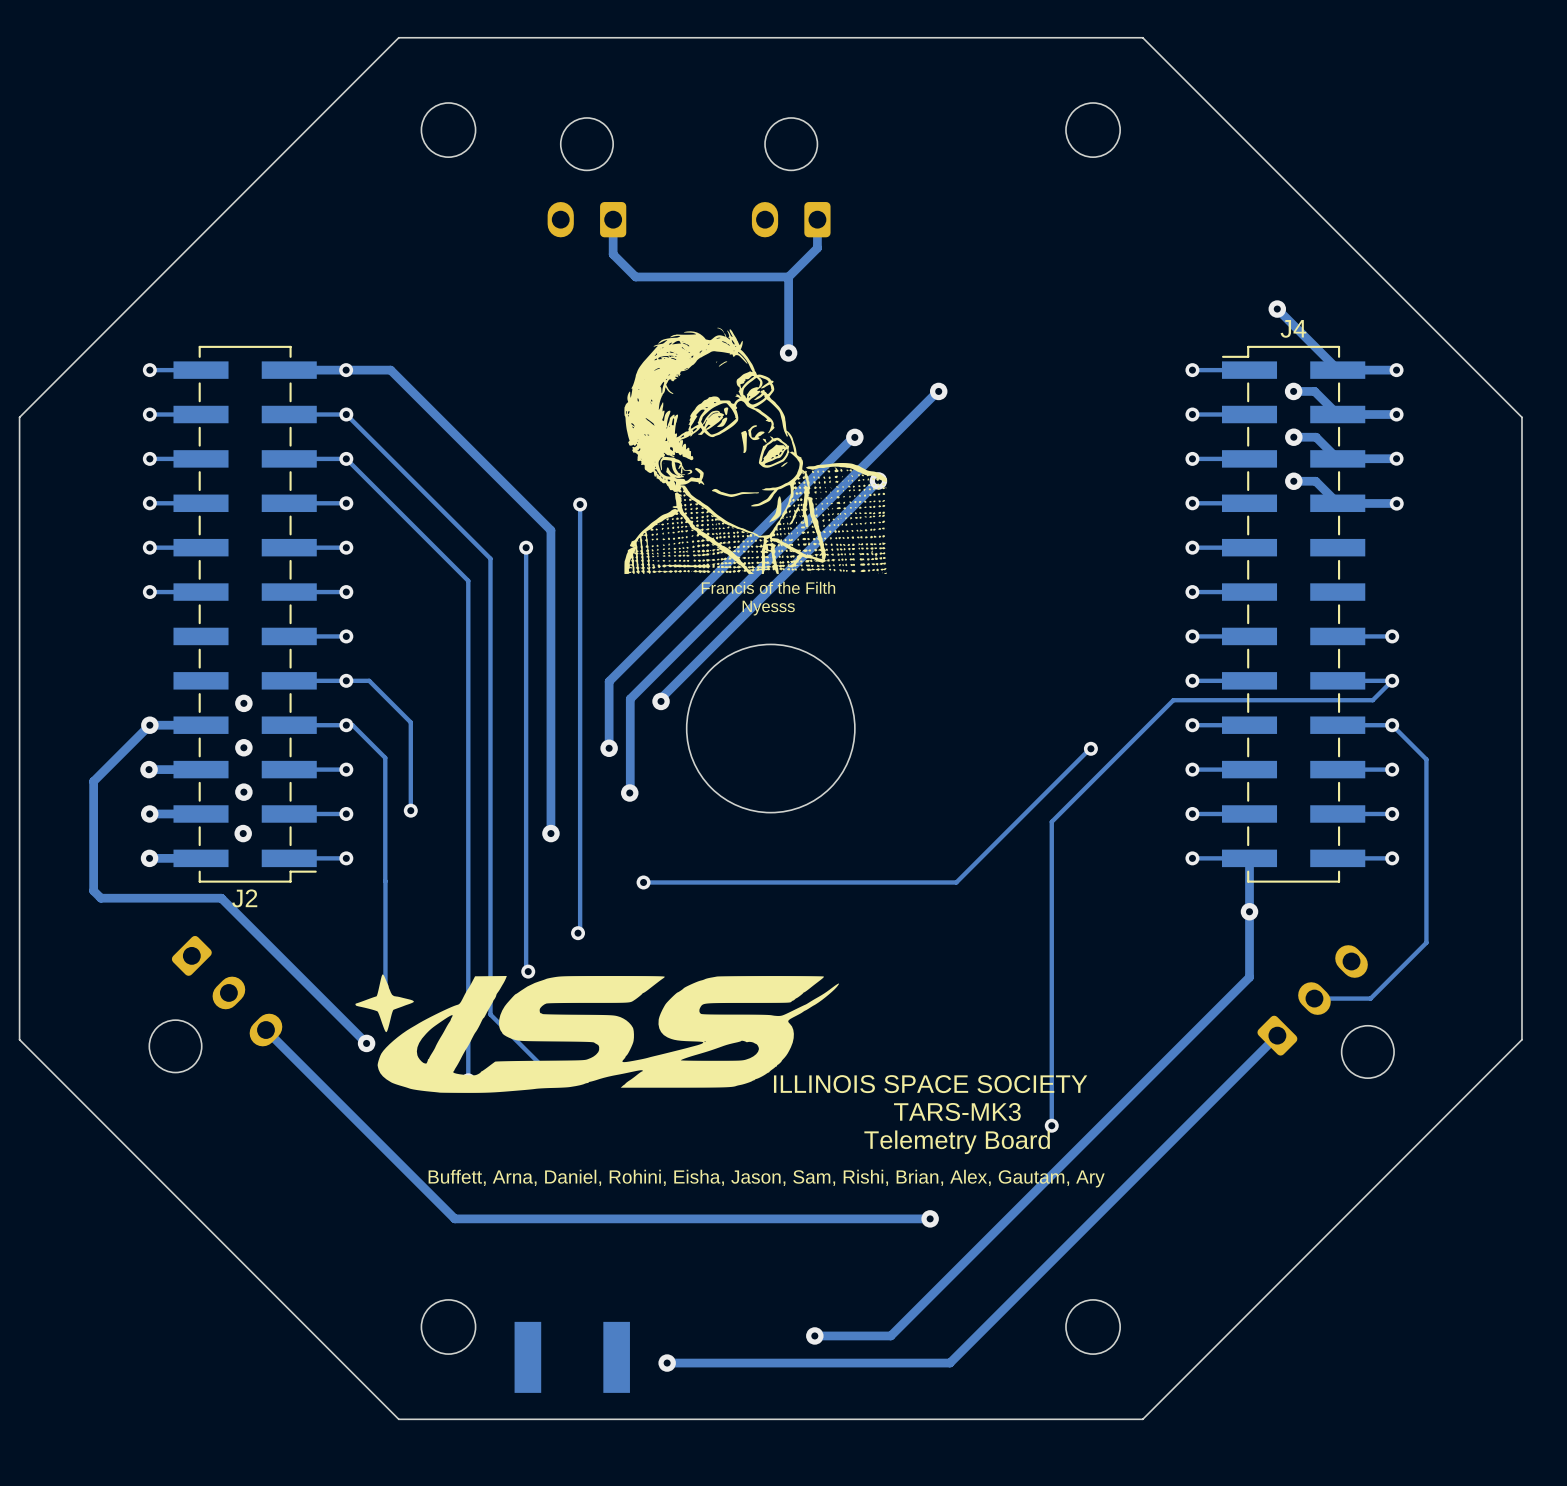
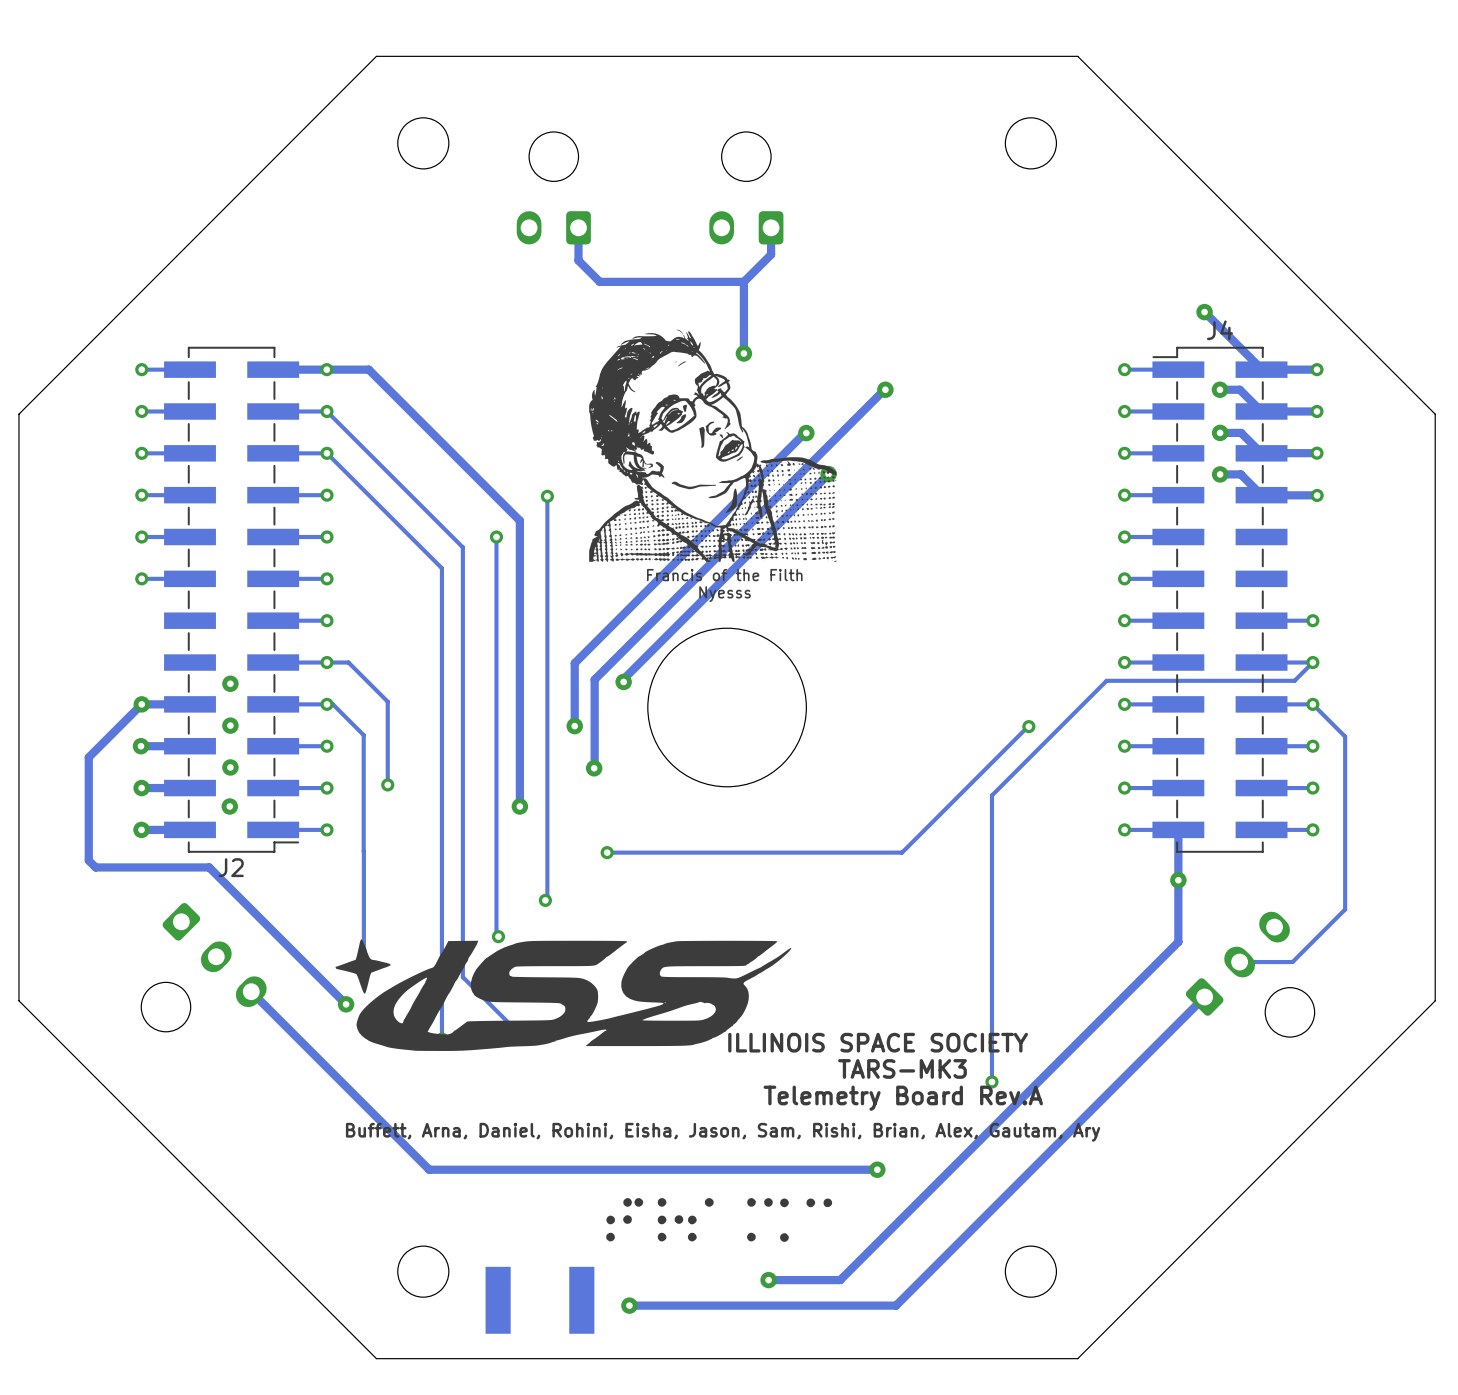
text: Telemetry Board (957, 1142) -> Telemetry Board Rev.A (903, 1098)
drawing: none -> [606, 1198, 833, 1242]

